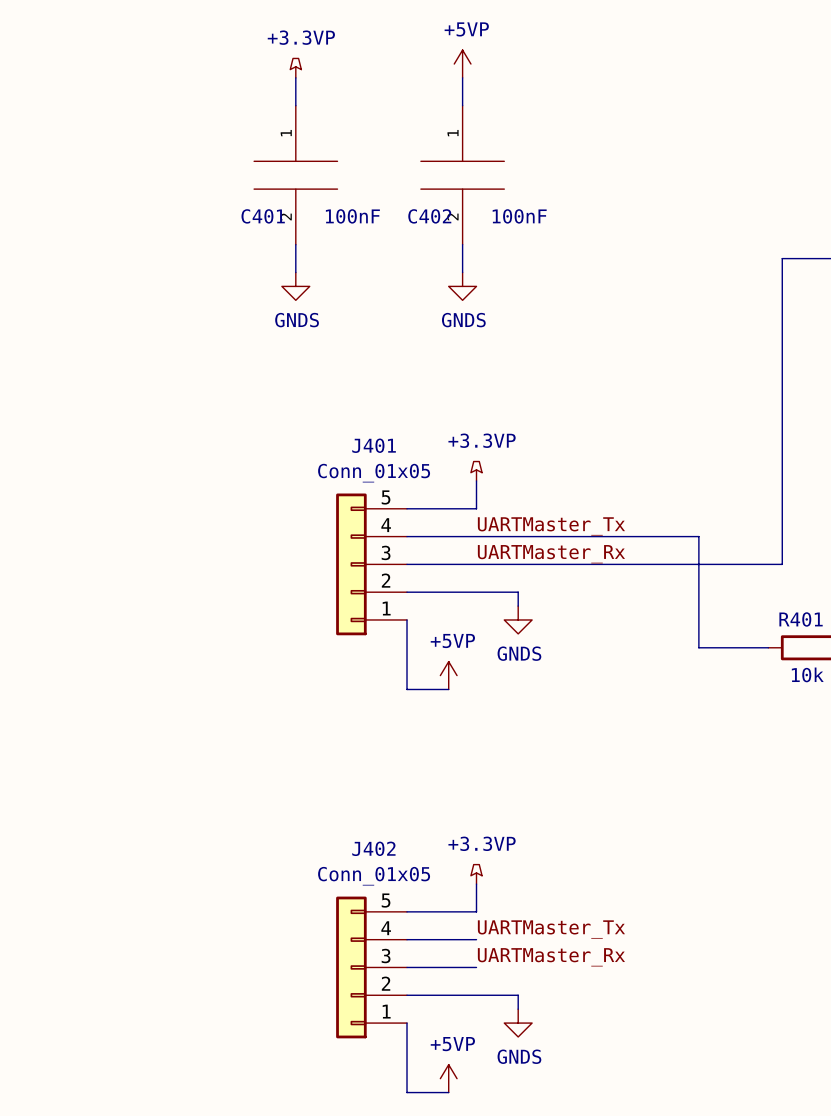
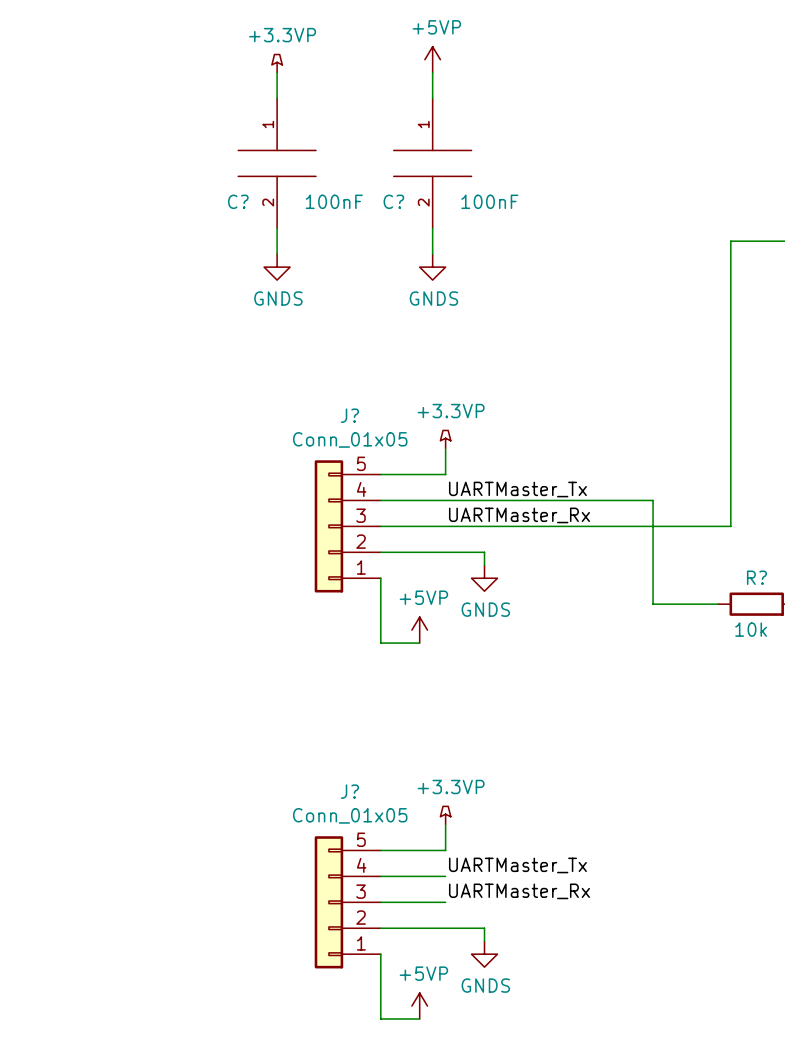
C401 name: C401 (263, 216) -> C? (238, 201)
C402 name: C402 (429, 216) -> C? (393, 201)
J401 name: J401 (374, 445) -> J? (349, 415)
R401 name: R401 (801, 619) -> R? (756, 577)
J402 name: J402 (373, 848) -> J? (349, 791)

